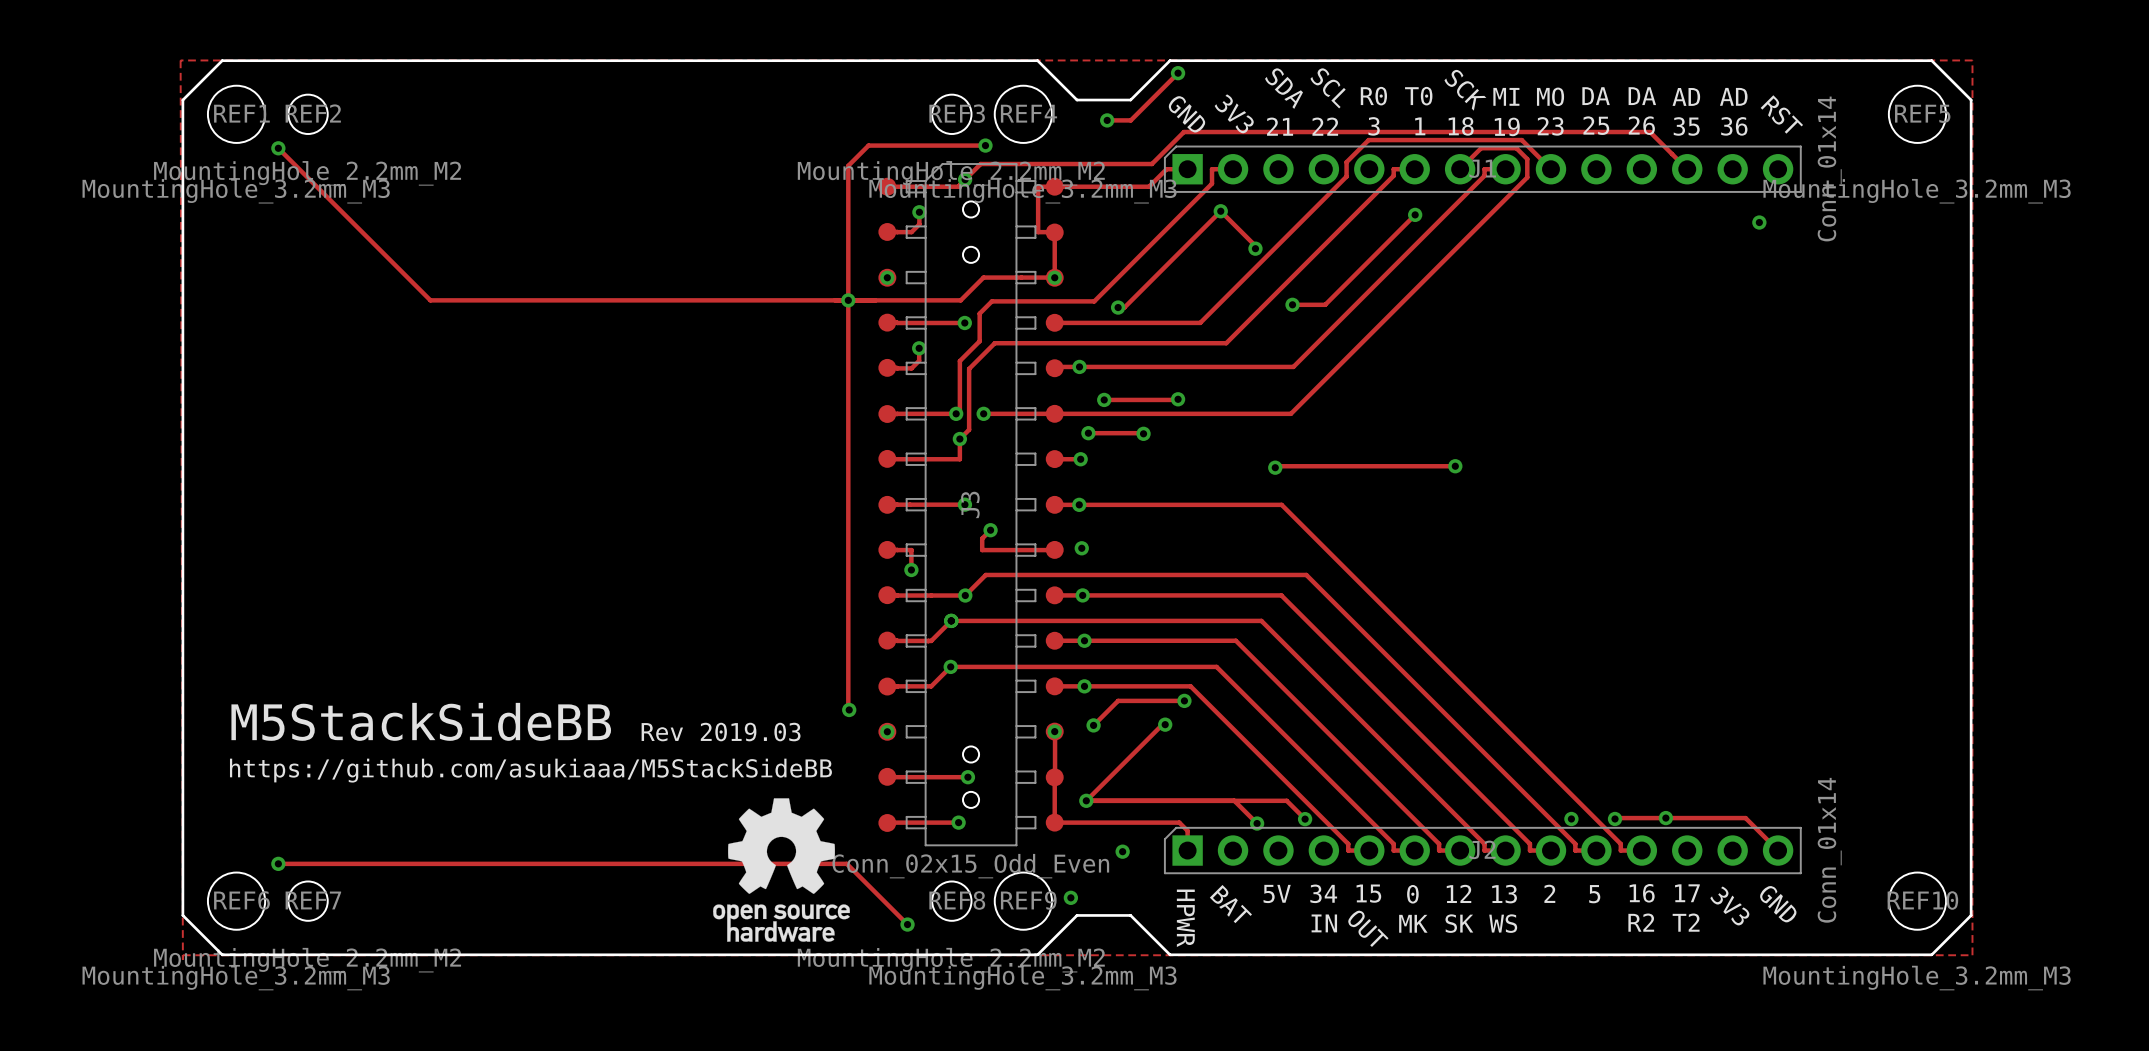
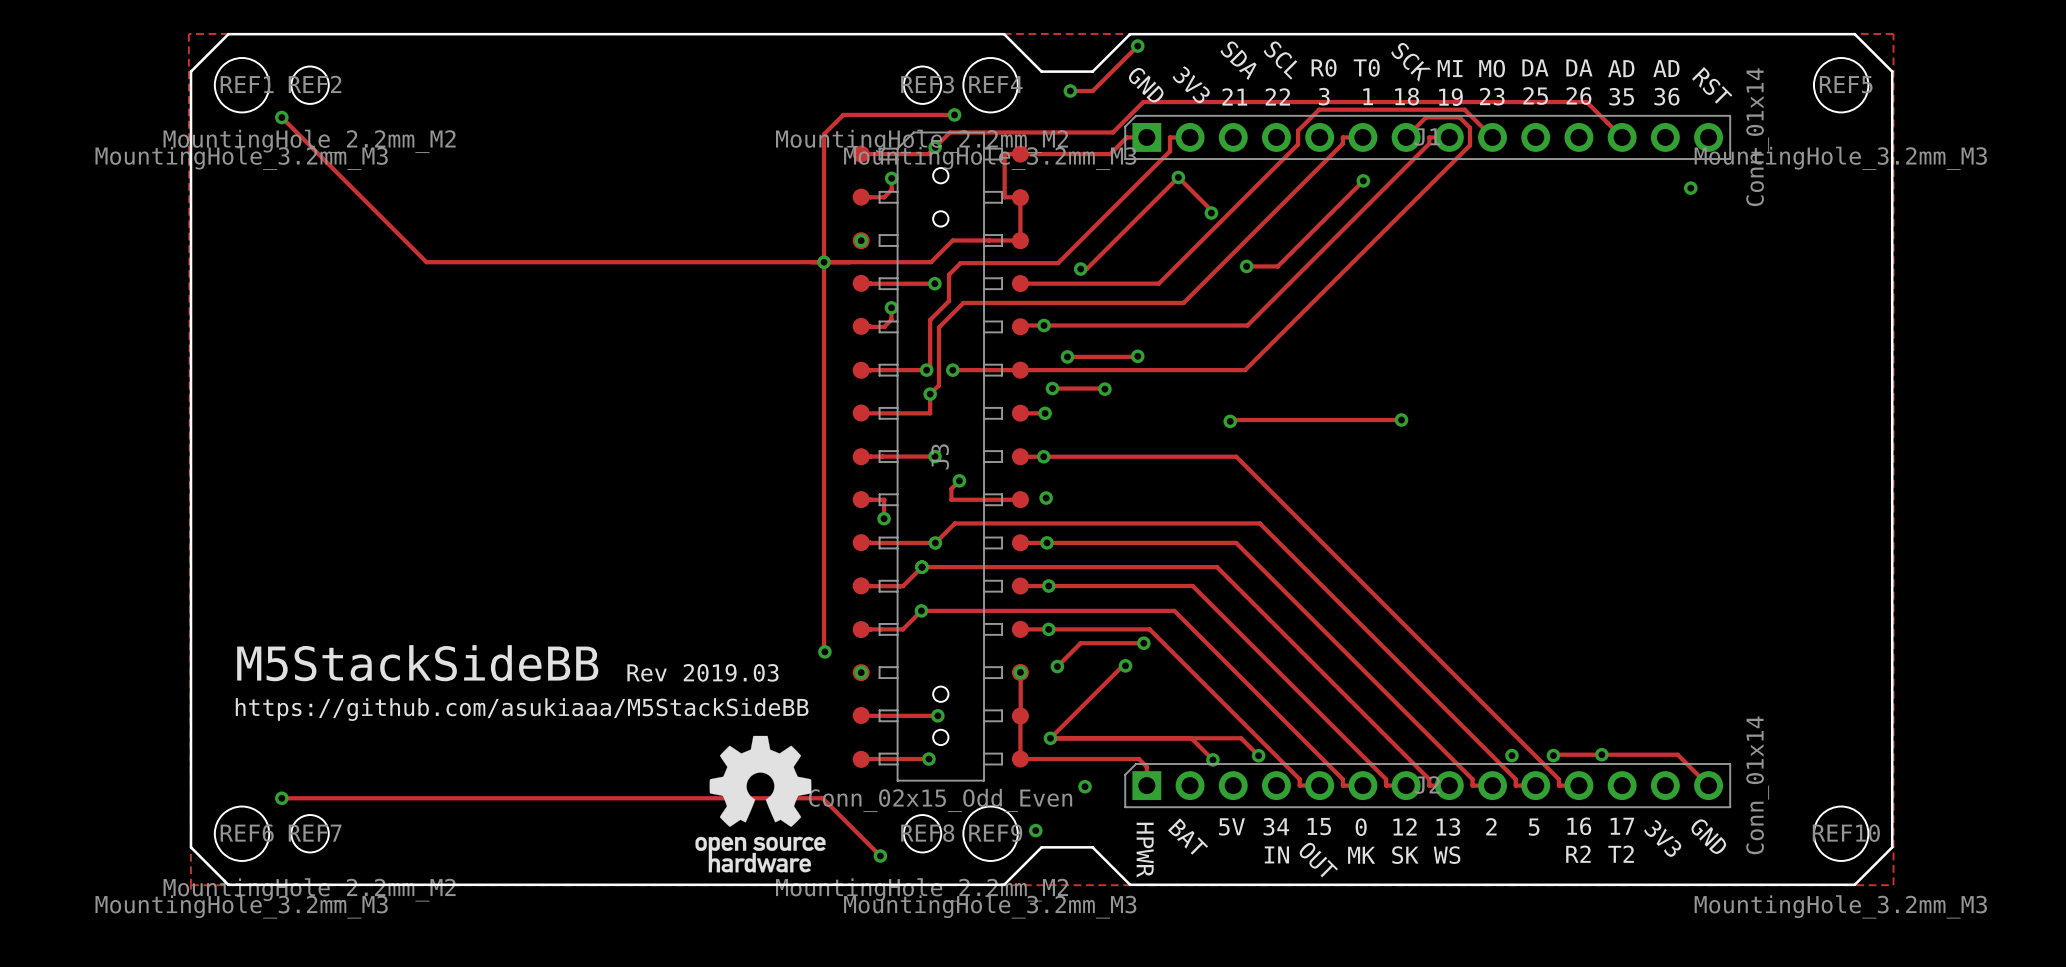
via: (1054, 277) -> none

